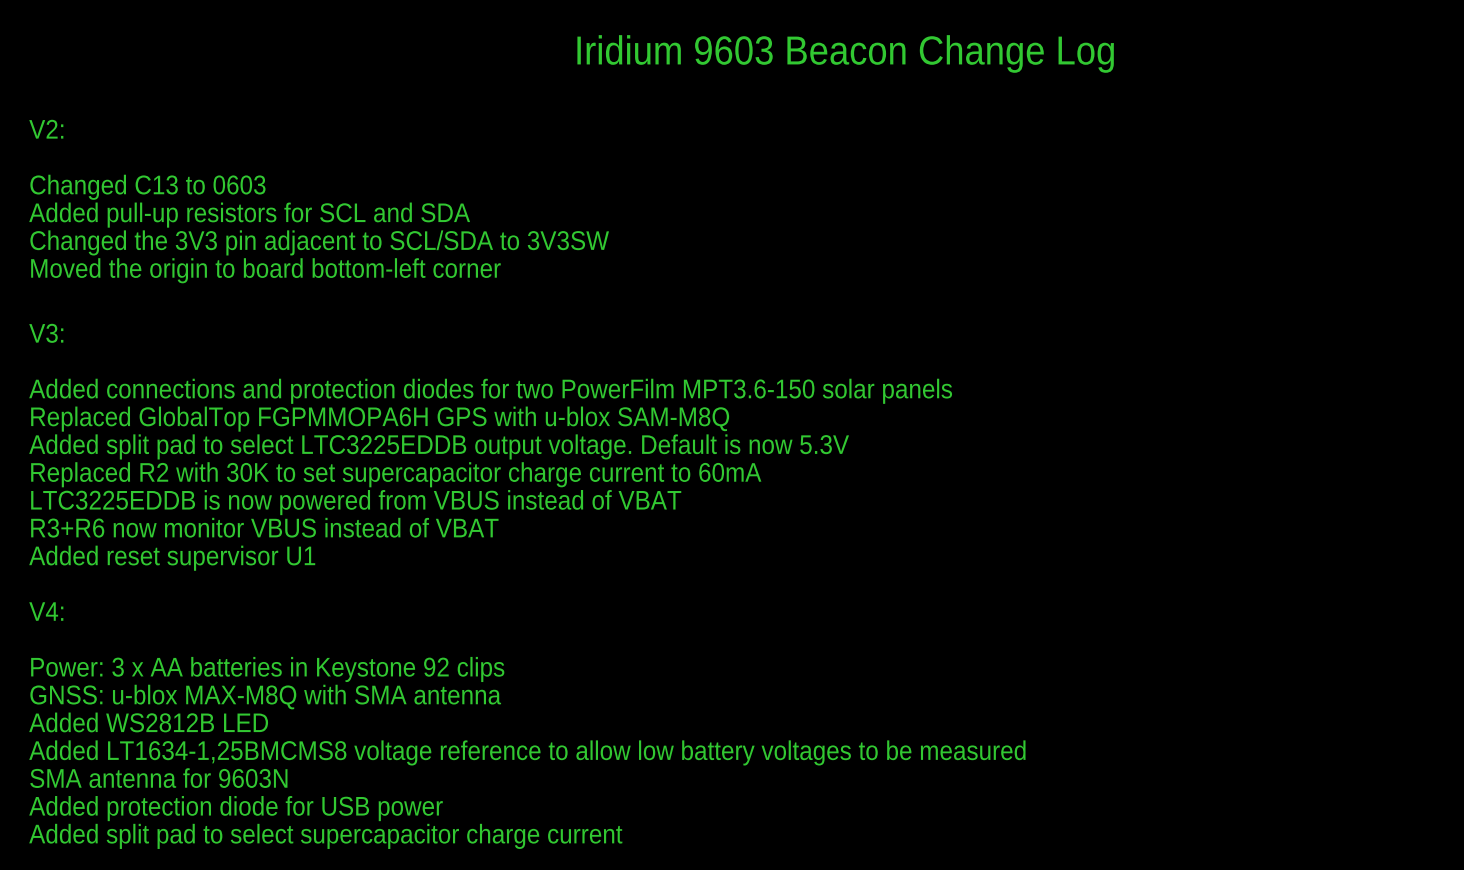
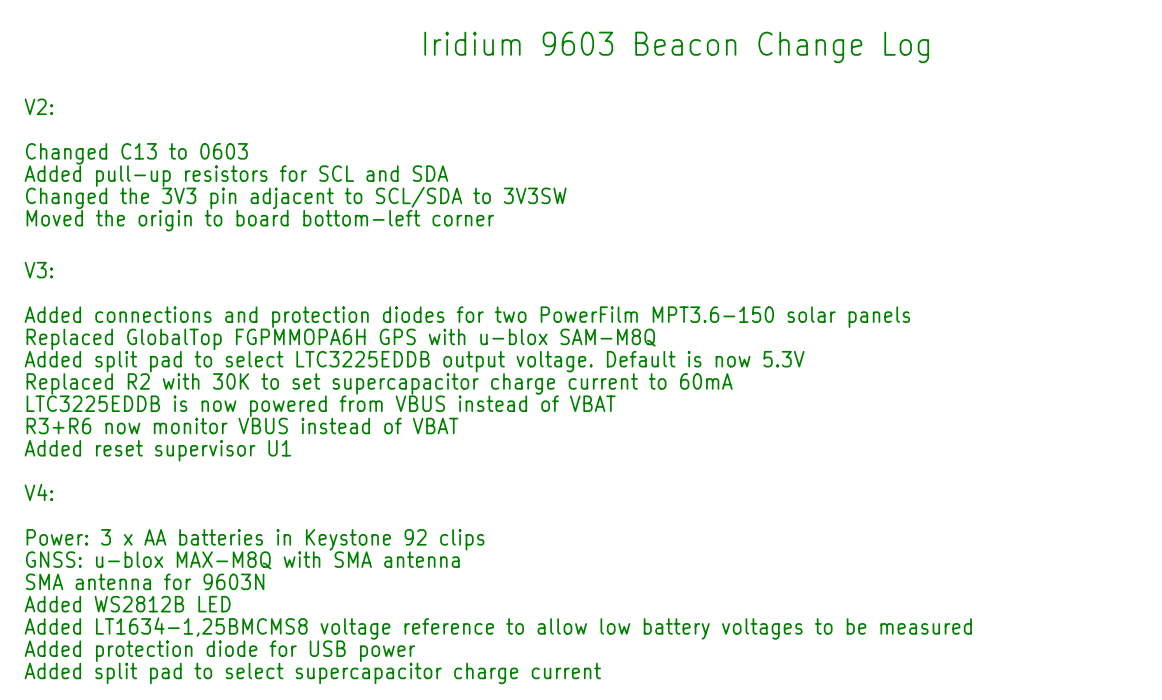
text: Added WS2812B LED (148, 722) -> SMA antenna for 9603N (145, 581)
text: Added LT1634-1,25BMCMS8 voltage reference to allow low battery voltages to be measured (527, 752) -> Added WS2812B LED (127, 604)
text: SMA antenna for 9603N (158, 778) -> Added LT1634-1,25BMCMS8 voltage reference to allow low battery voltages to be measured (498, 628)

